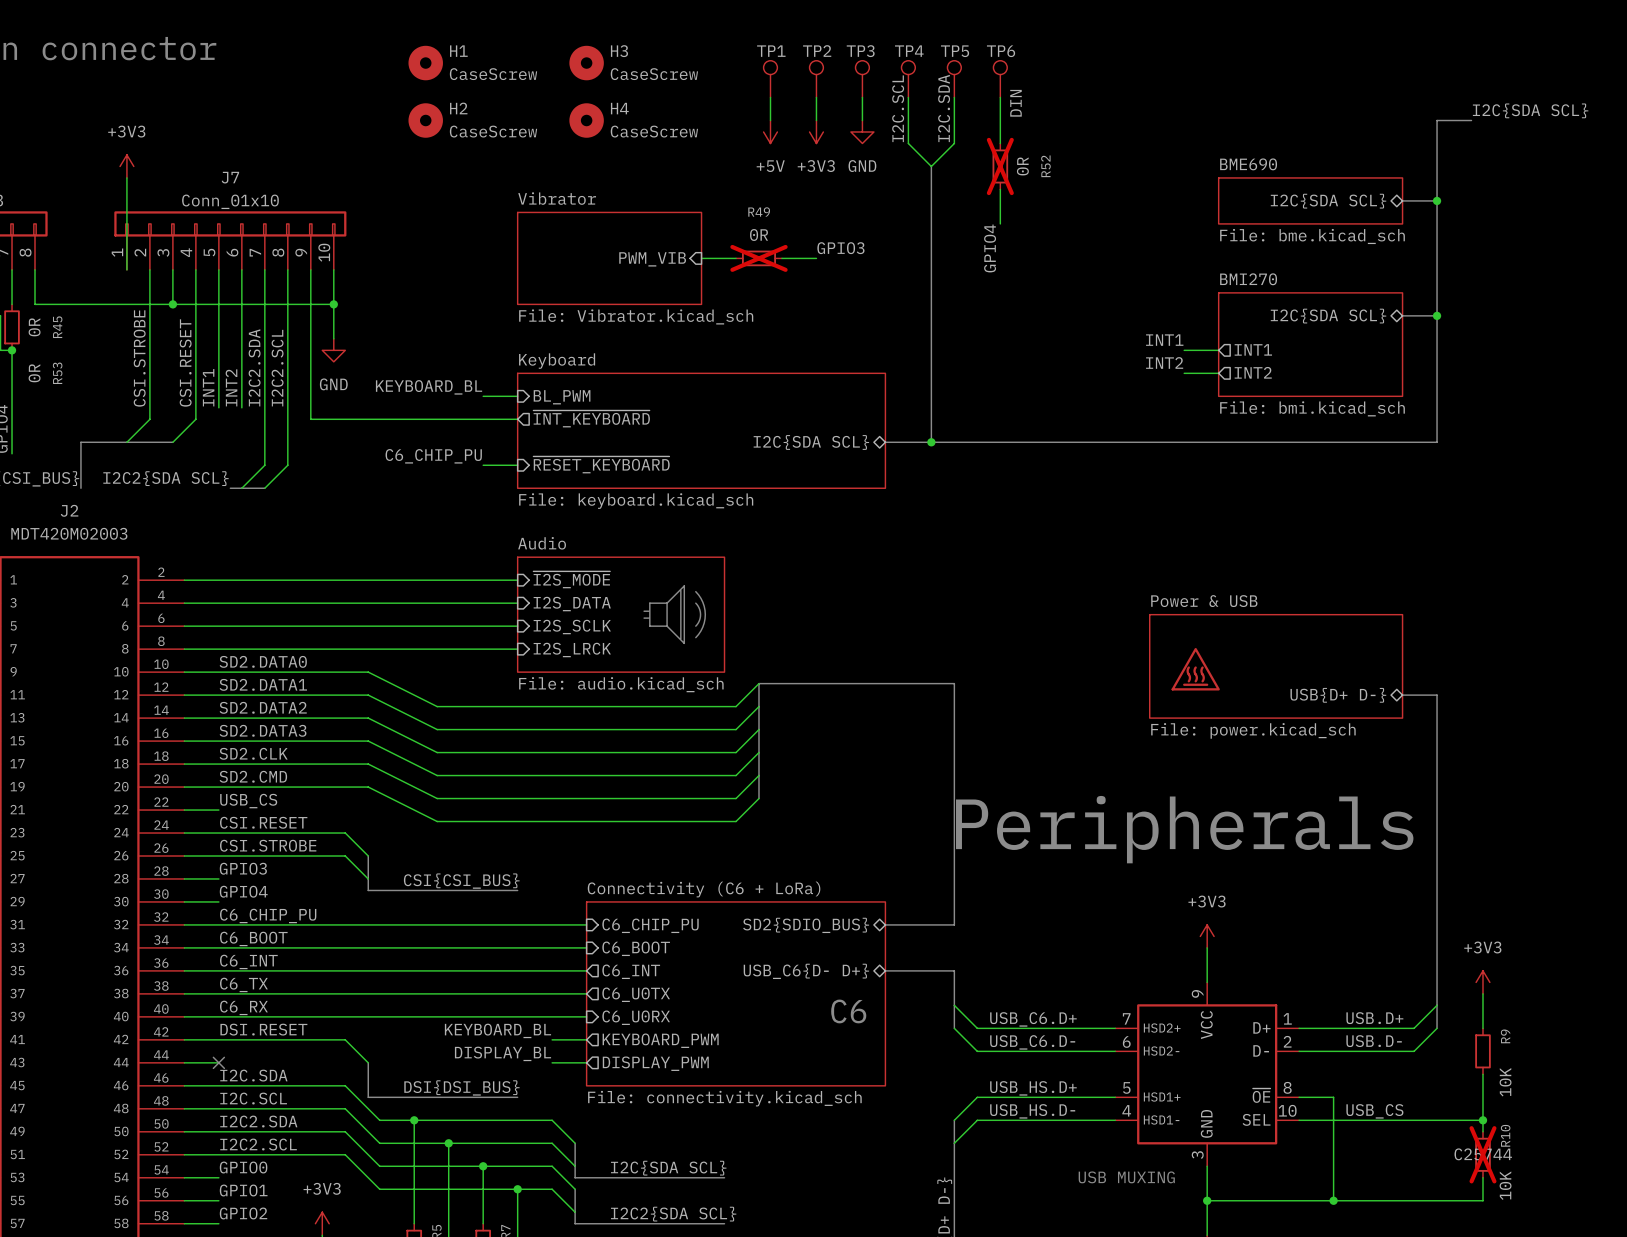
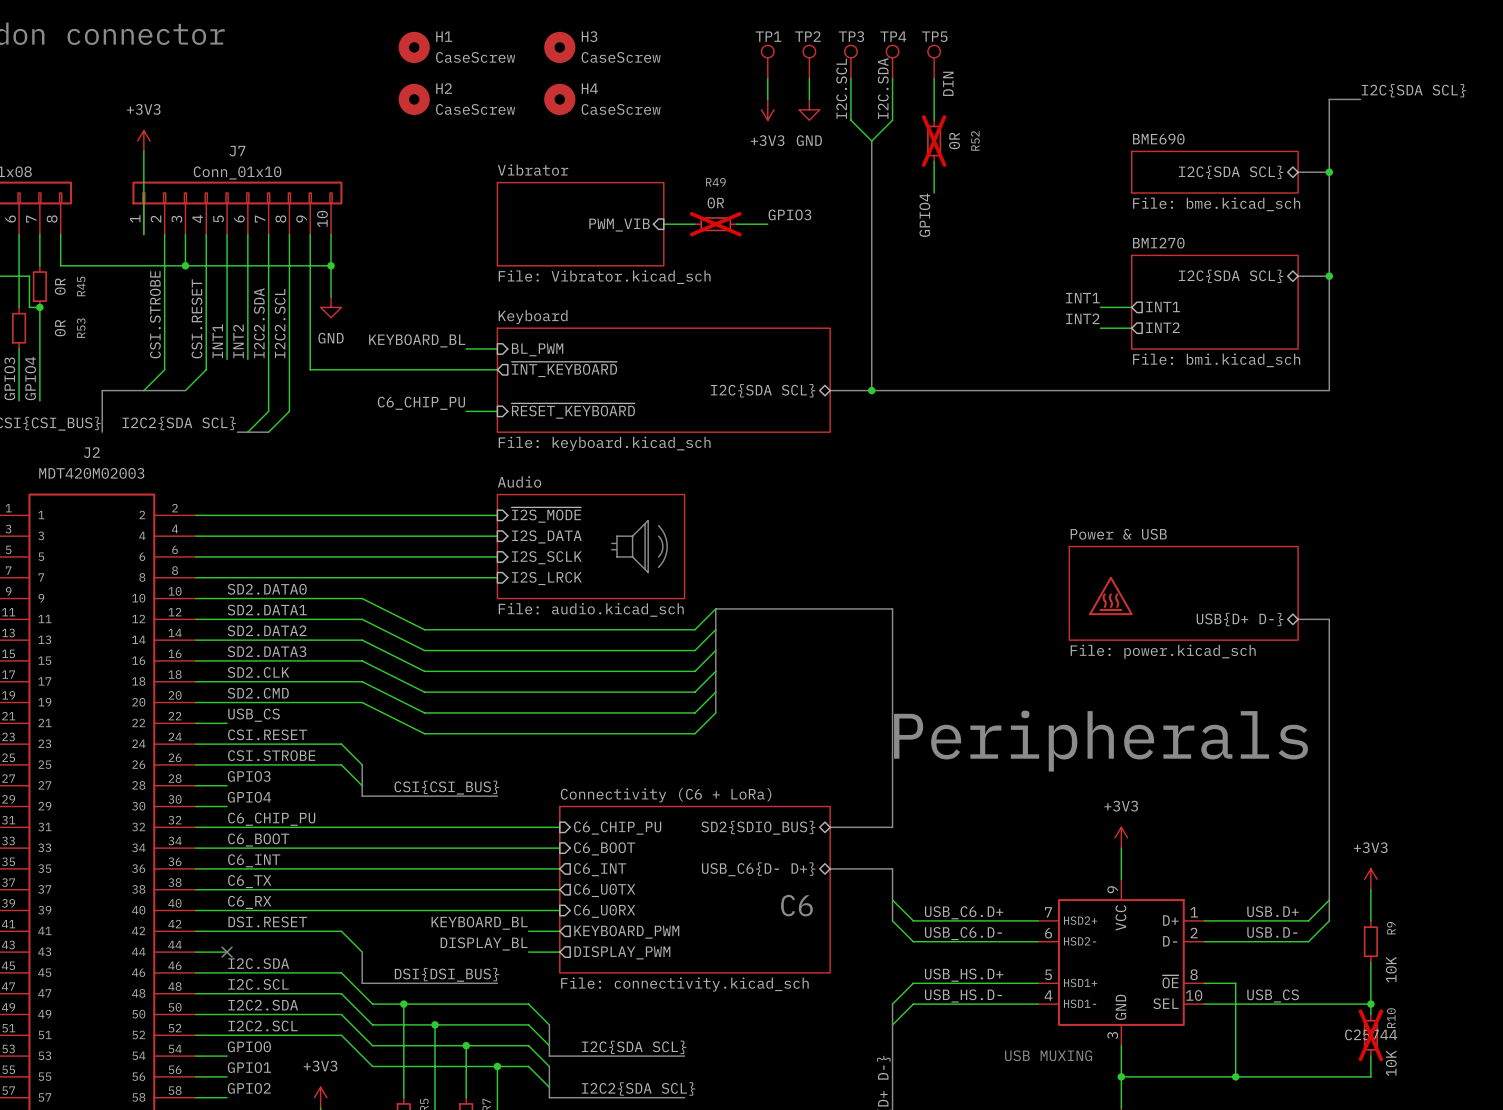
TP2 name: TP2 (817, 51) -> TP1 (768, 36)
TP3 name: TP3 (860, 51) -> TP2 (807, 36)
TP4 name: TP4 (909, 51) -> TP3 (851, 36)
TP5 name: TP5 (955, 51) -> TP4 (893, 36)
TP6 name: TP6 (1001, 51) -> TP5 (934, 36)
TP1: (770, 79) -> none
wire: (770, 97) (770, 120) -> none
power symbol: +5V (770, 132) -> none

